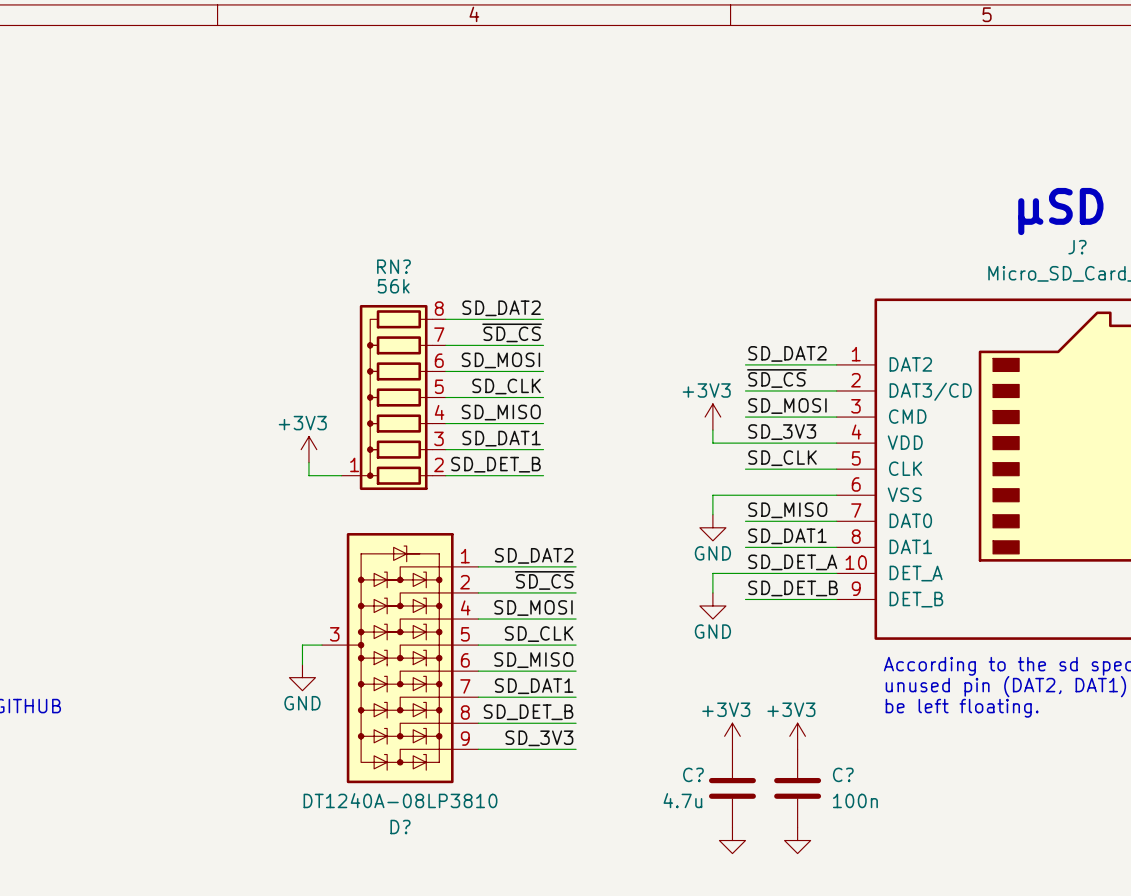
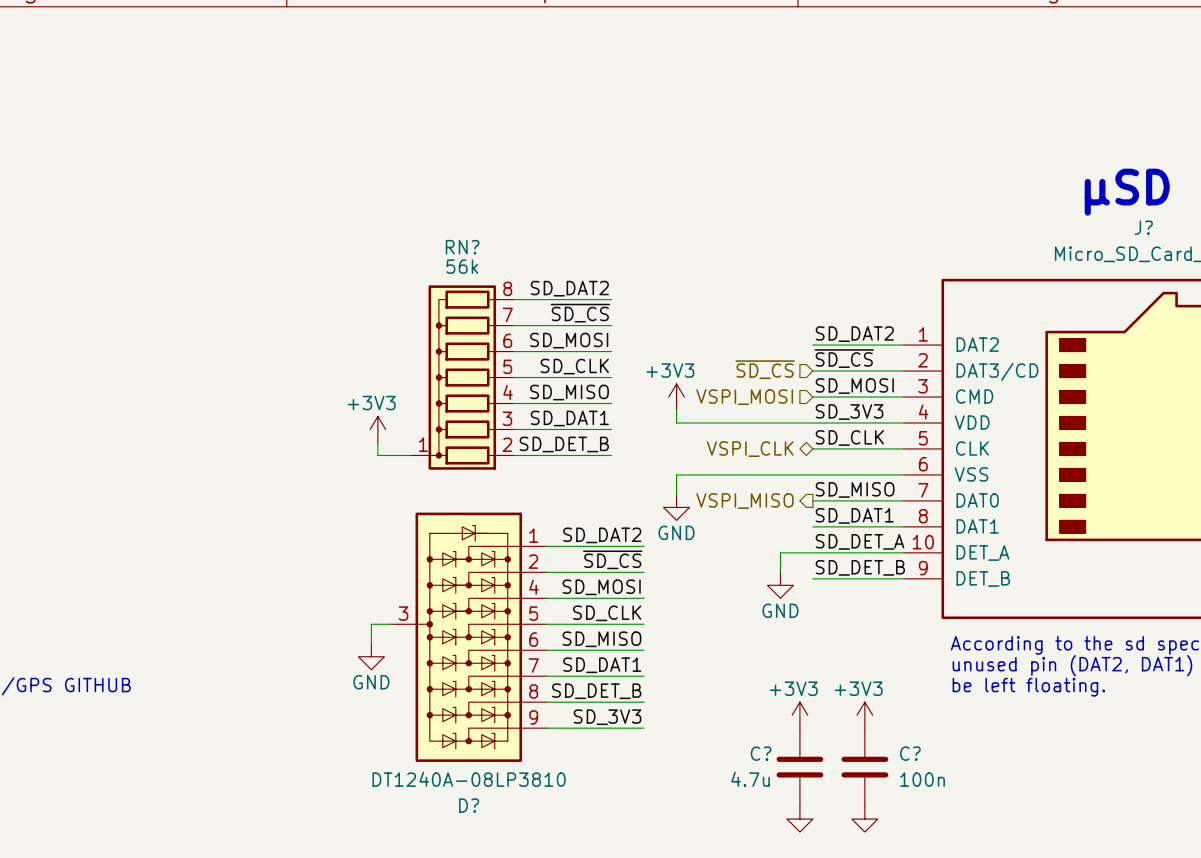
hierarchical label: none -> ~{SD_CS} (765, 369)
hierarchical label: none -> VSPI_MOSI (744, 397)
power symbol position: +3V3 (712, 417) -> +3V3 (676, 397)
wire: (712, 430) (712, 443) -> (676, 410) (676, 422) (780, 422)
hierarchical label: none -> VSPI_CLK (750, 449)
wire: (712, 495) (712, 514) -> (780, 474) (676, 474) (676, 494)
hierarchical label: none -> VSPI_MISO (745, 501)
power symbol position: GND (712, 527) -> GND (676, 507)

